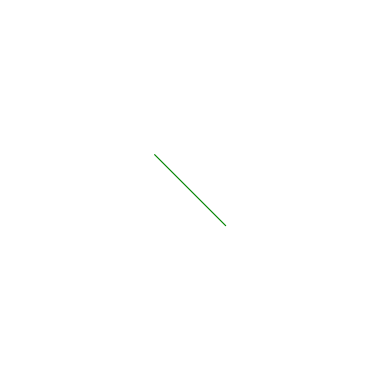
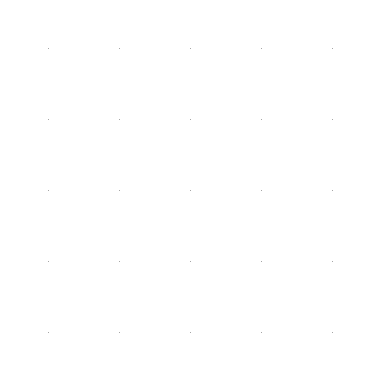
wire: (154, 154) (225, 225) -> none

